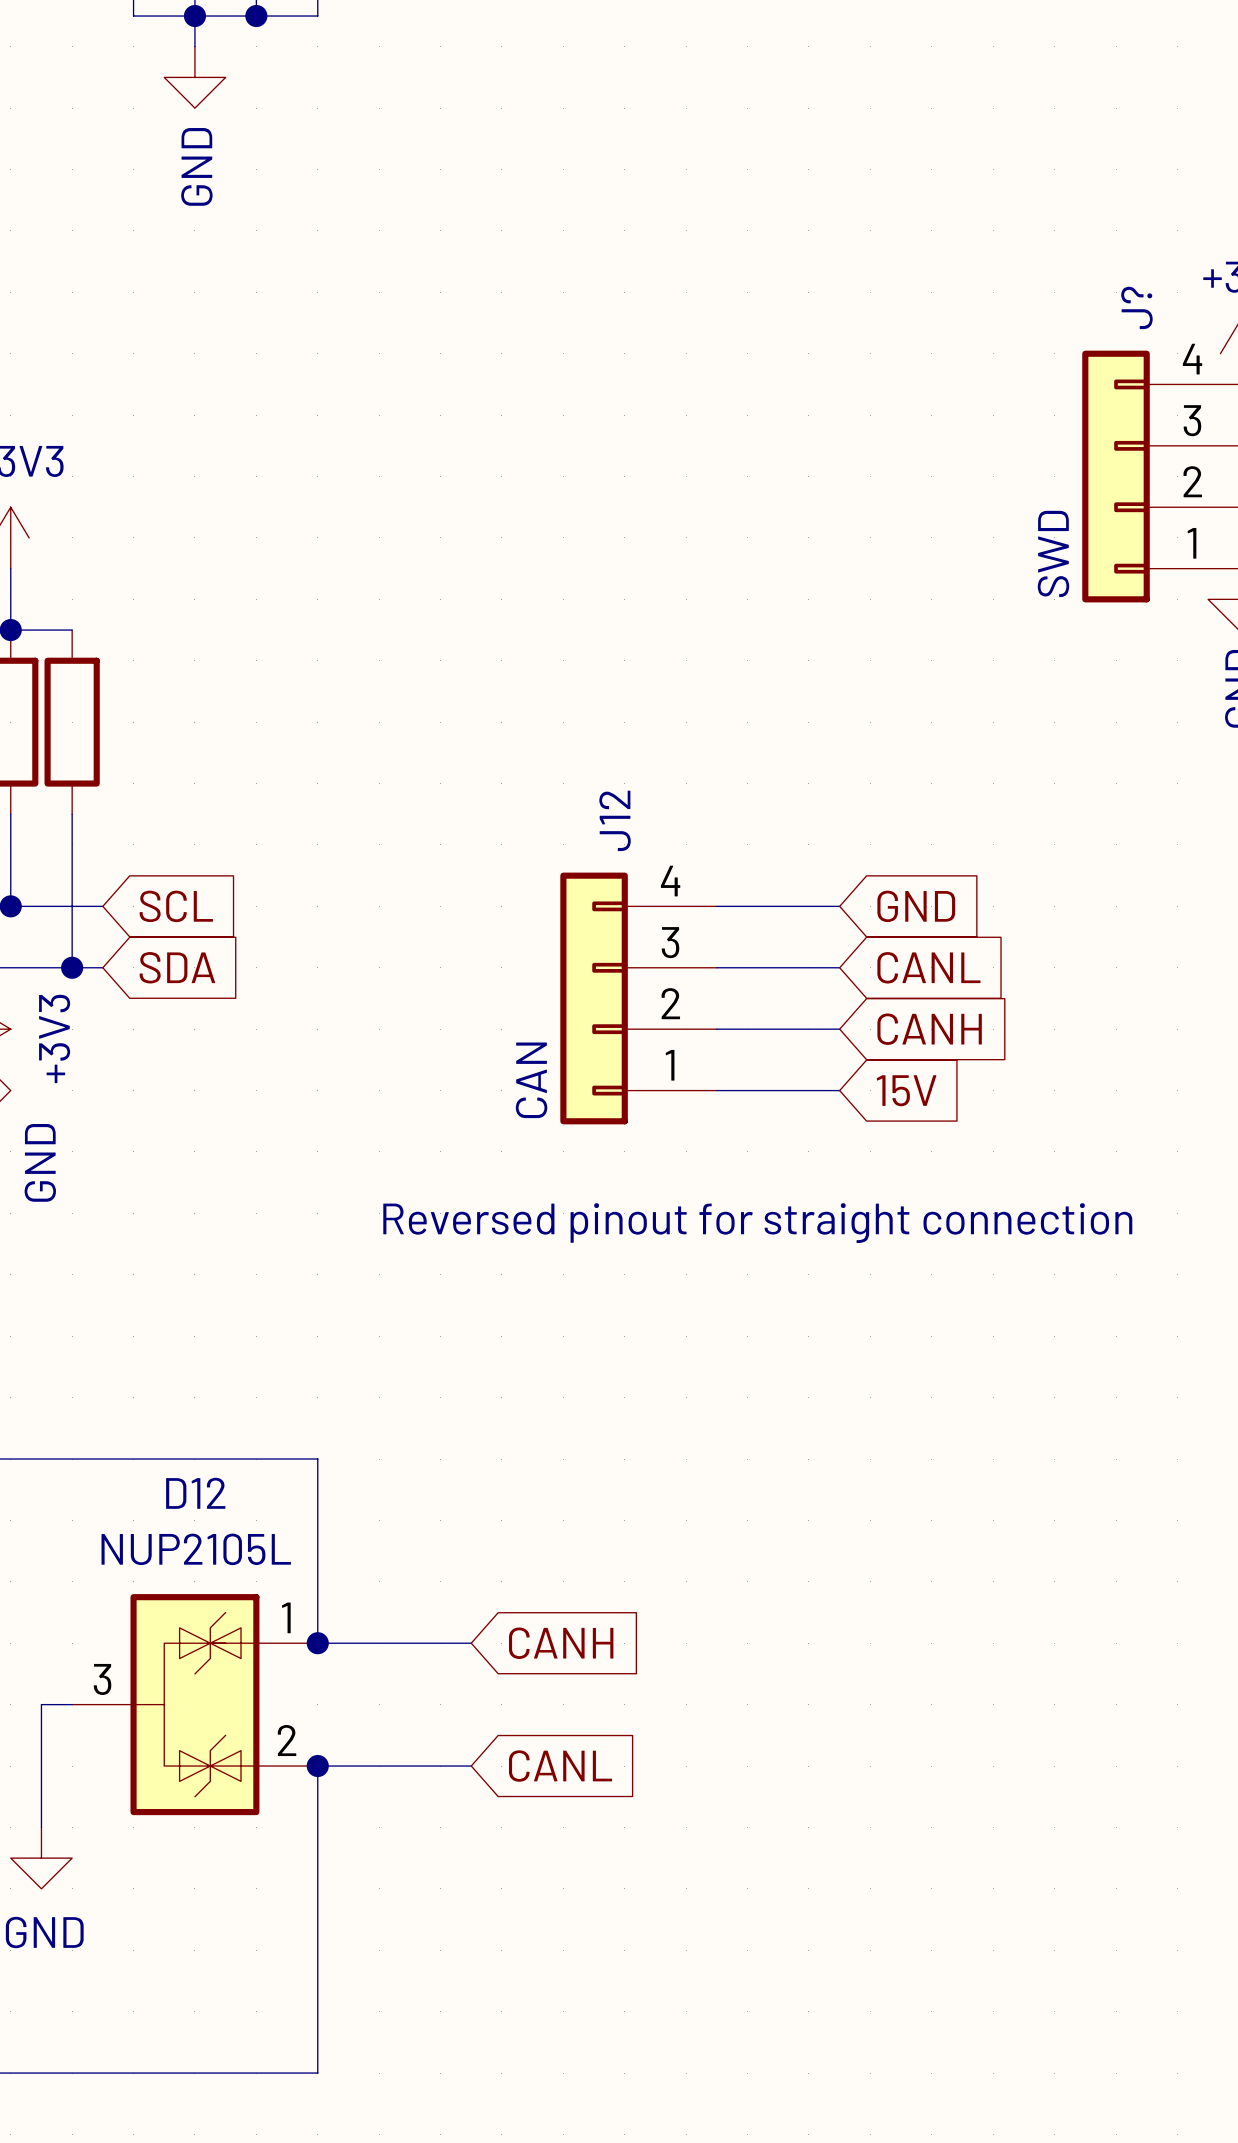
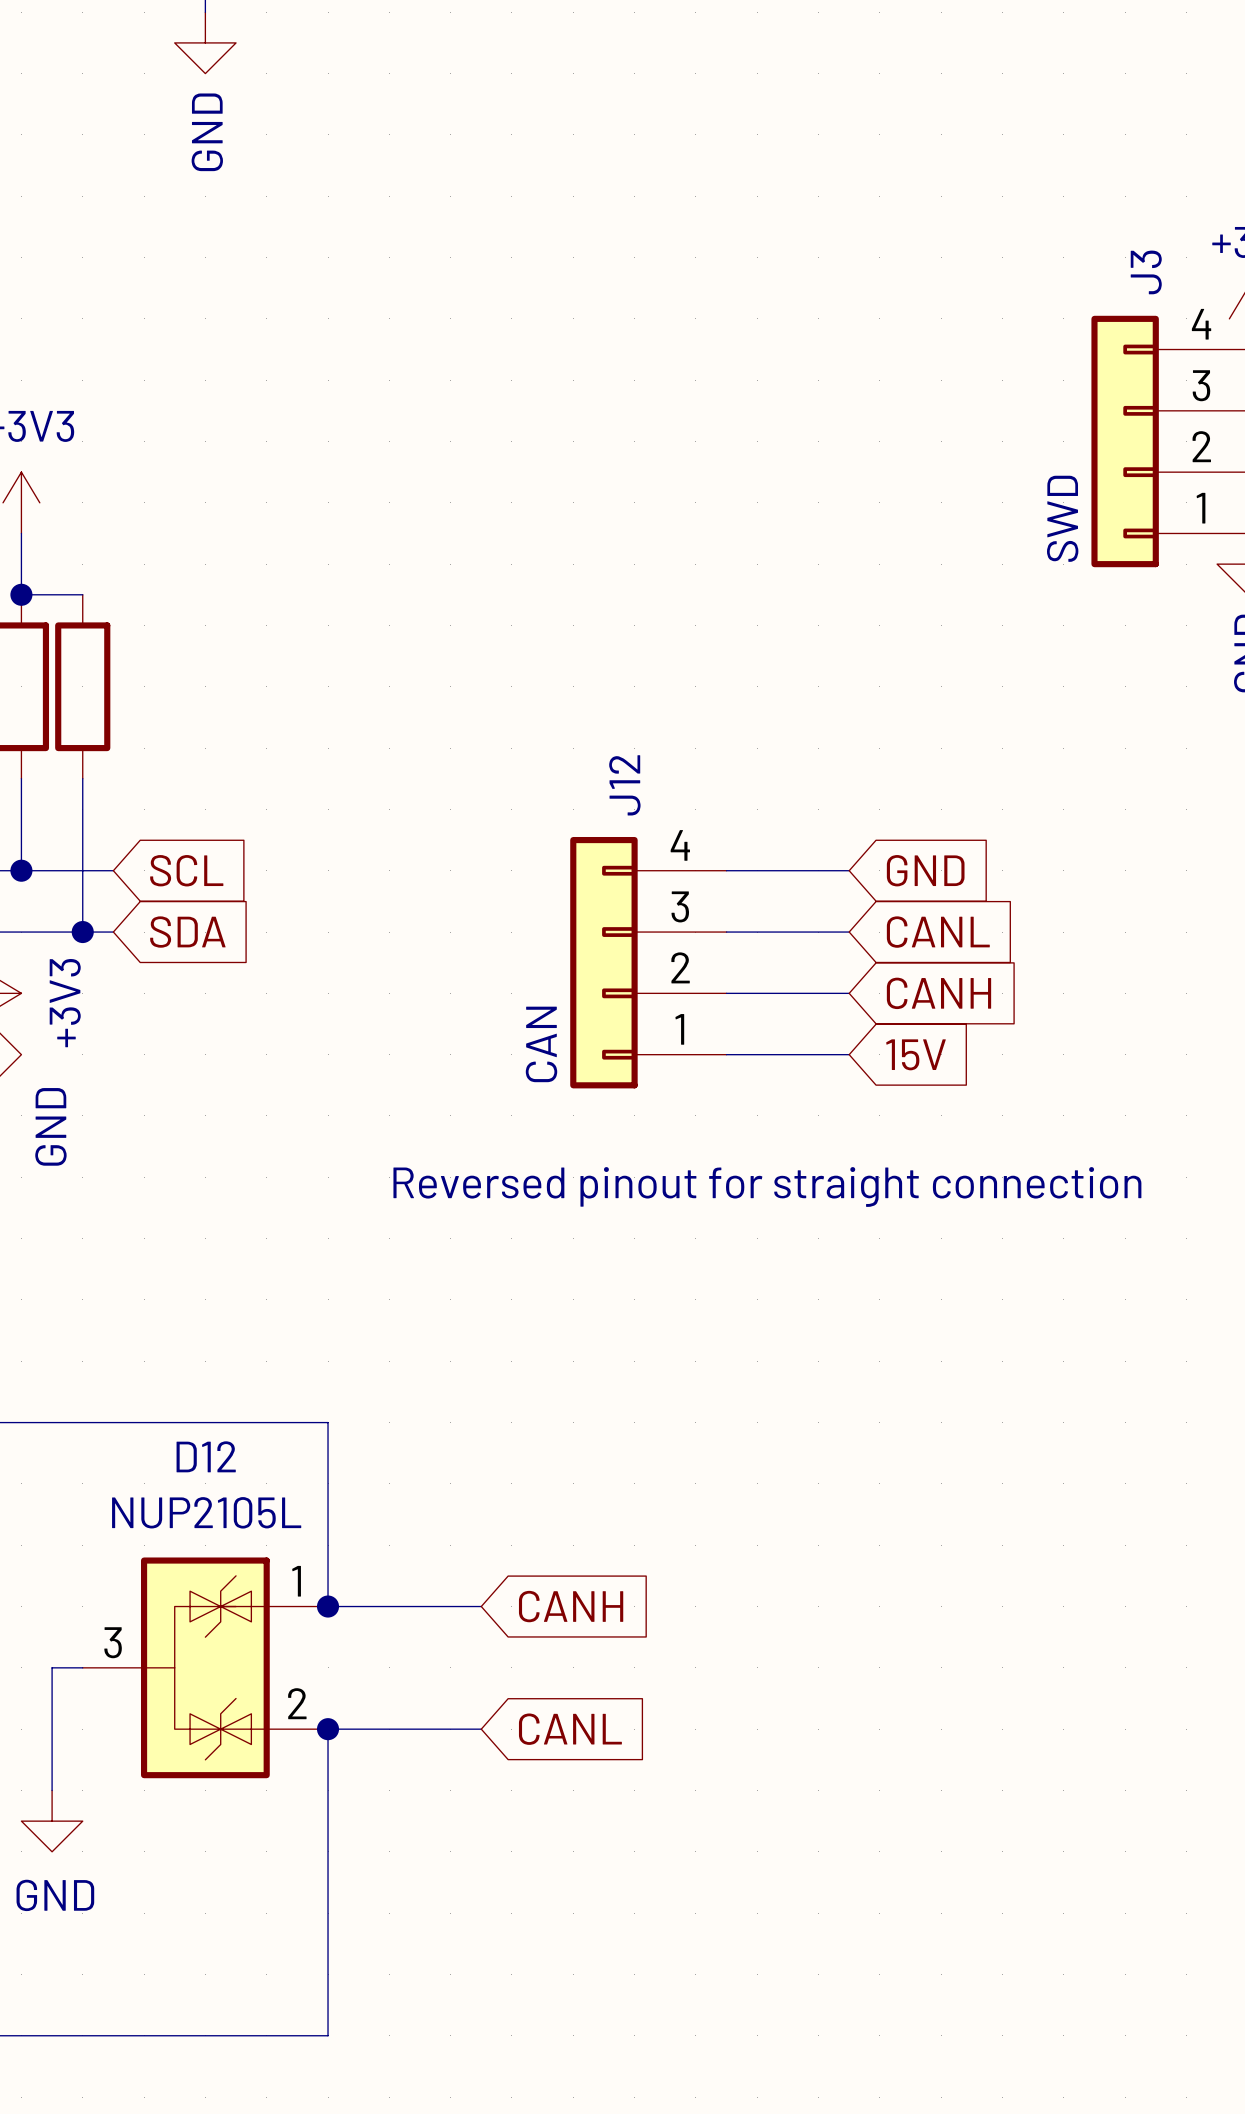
J? name: J? (1136, 307) -> J3 (1146, 272)

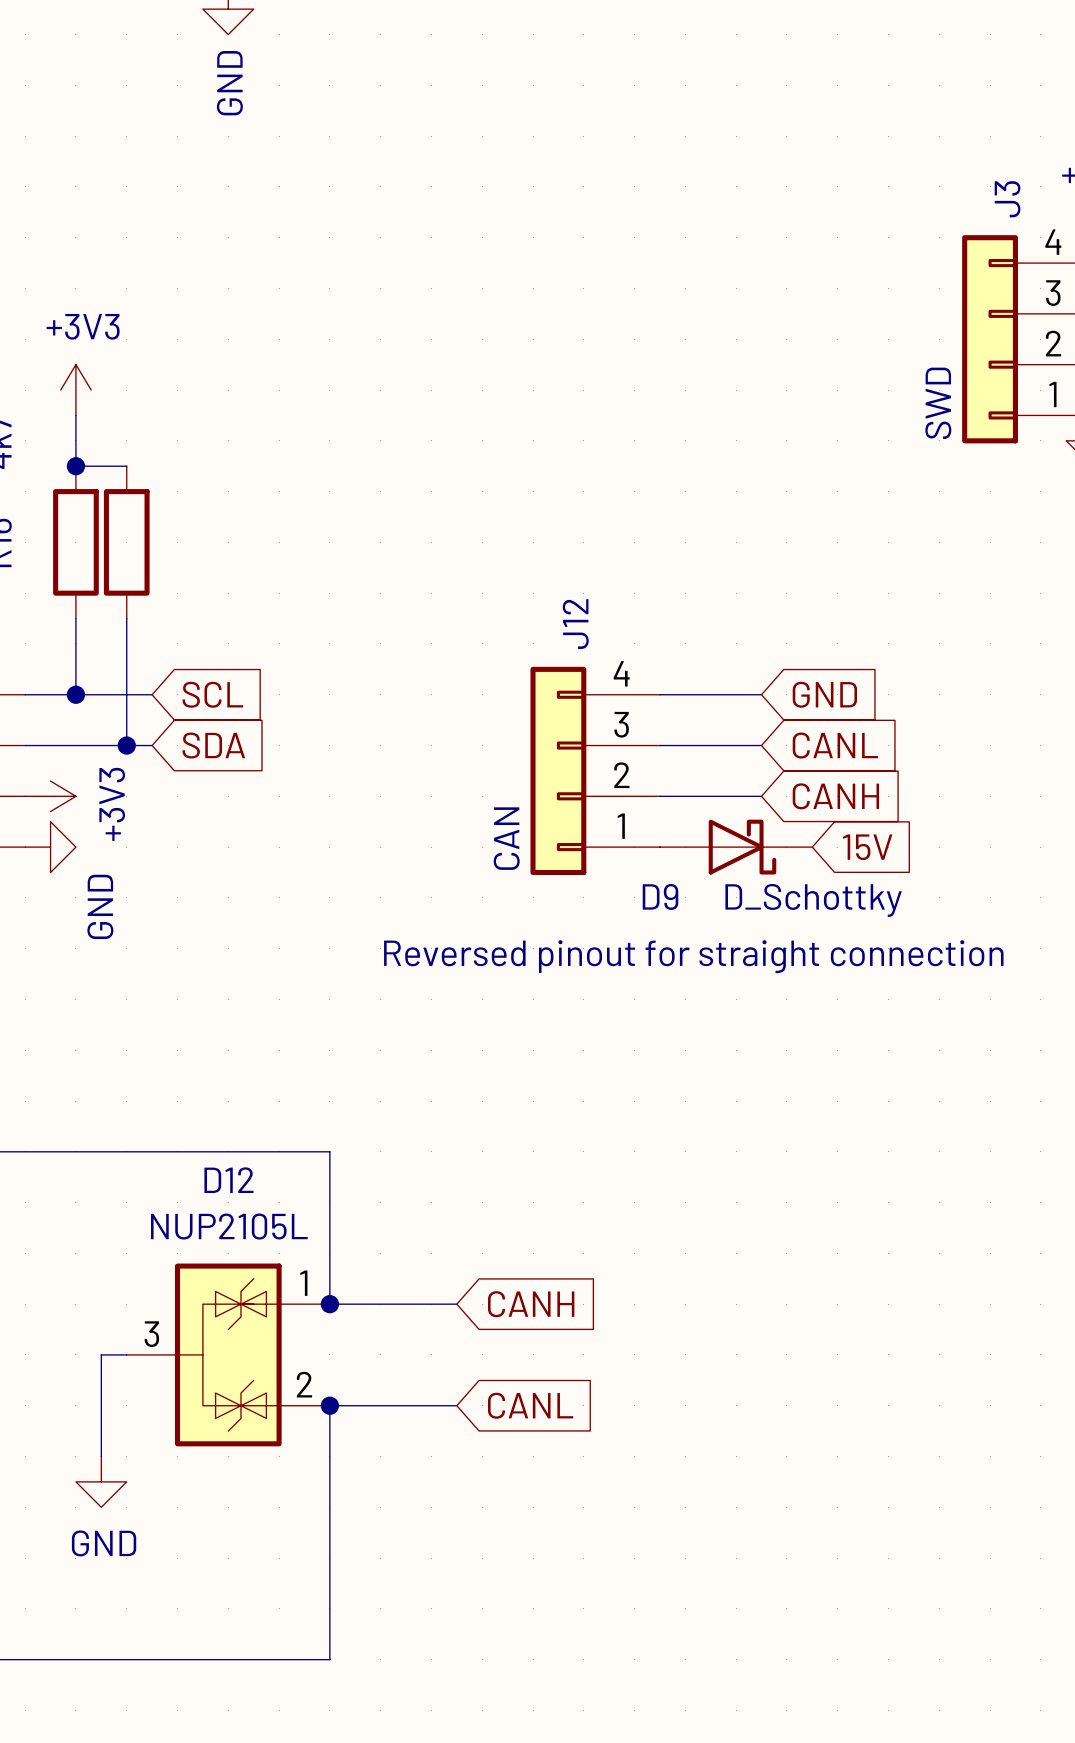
D9: none -> D_Schottky (736, 847)
global label position: 15V (916, 1054) -> 15V (867, 847)

